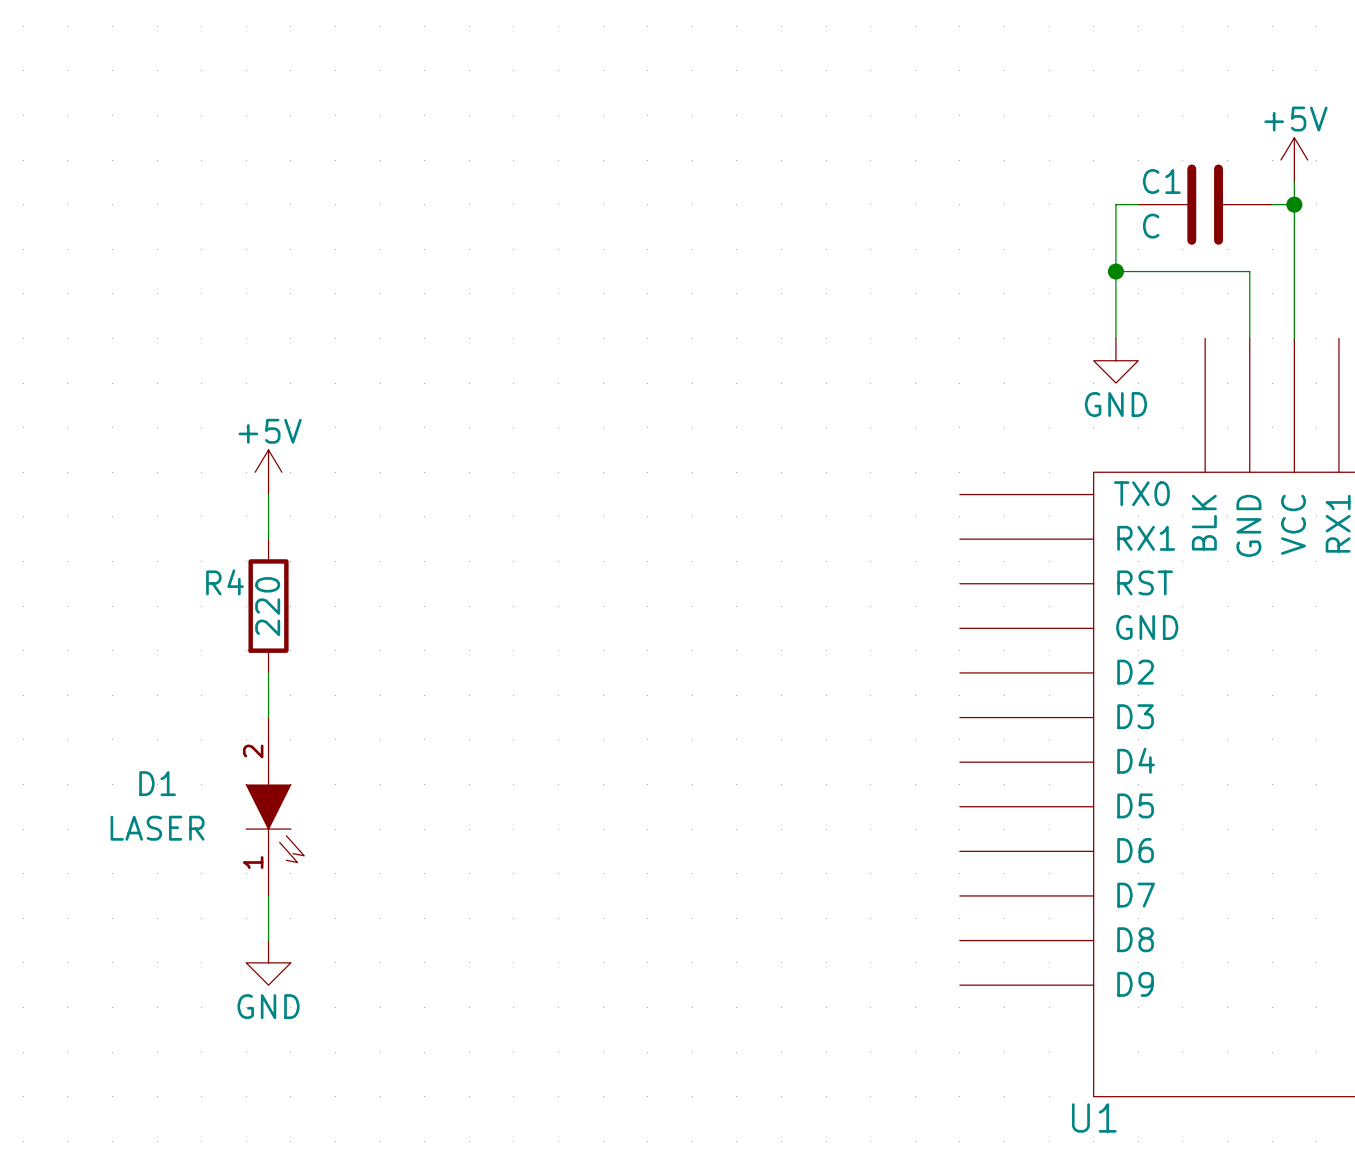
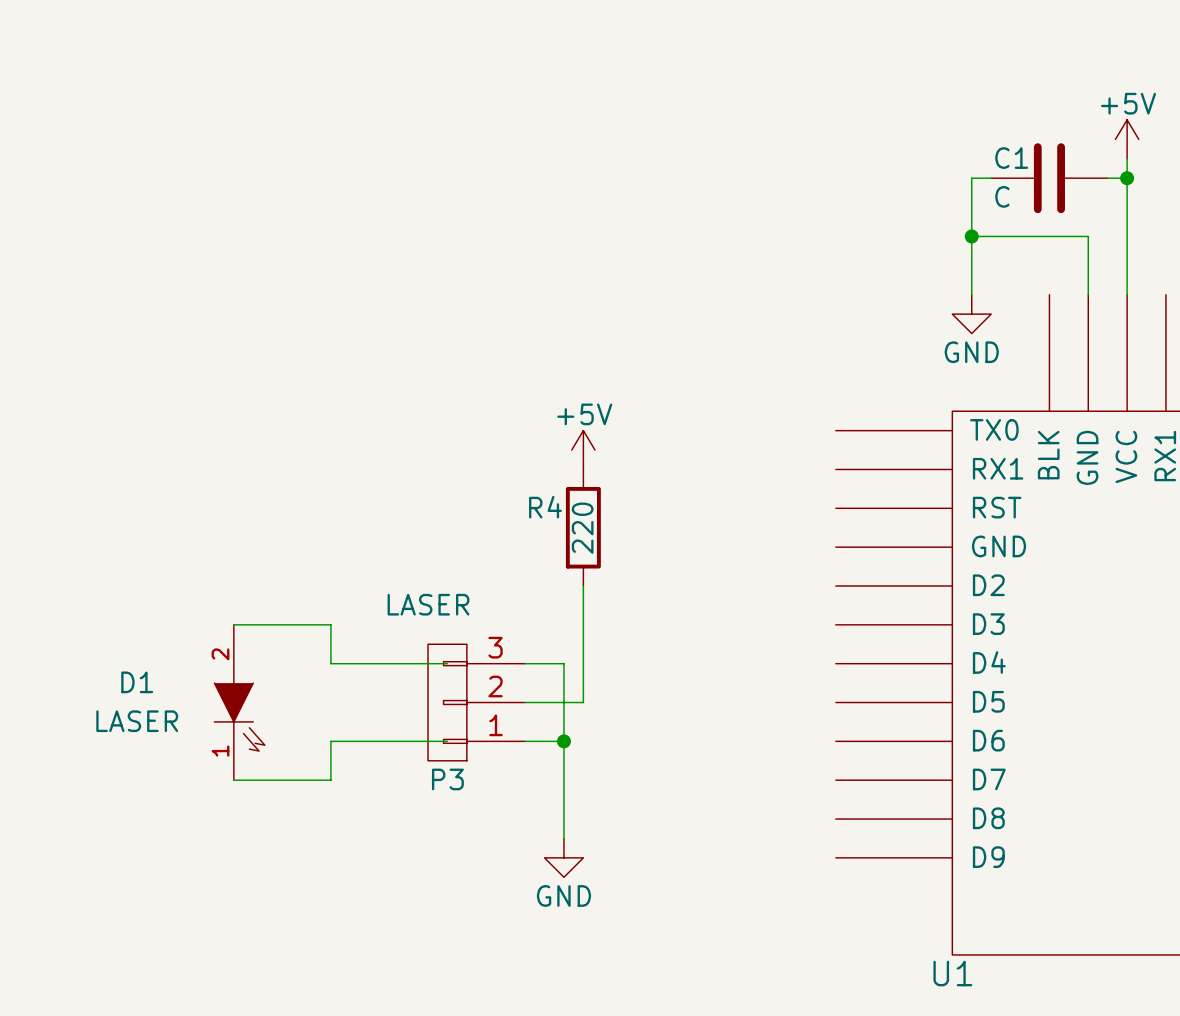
power symbol position: +5V (268, 472) -> +5V (583, 450)
wire: (268, 494) (268, 539) -> none
R4 position: (268, 606) -> (583, 527)
wire: (268, 672) (268, 717) -> (447, 663) (330, 663) (330, 624) (233, 624)
wire: none -> (583, 586) (583, 702) (525, 702)
wire: none -> (525, 663) (563, 663) (563, 838)
P3: none -> LASER (476, 702)
wire: none -> (525, 741) (563, 741)
junction: none -> (563, 741)
wire: (268, 895) (268, 940) -> (233, 780) (330, 780) (330, 741) (447, 741)
power symbol position: GND (268, 962) -> GND (563, 857)

